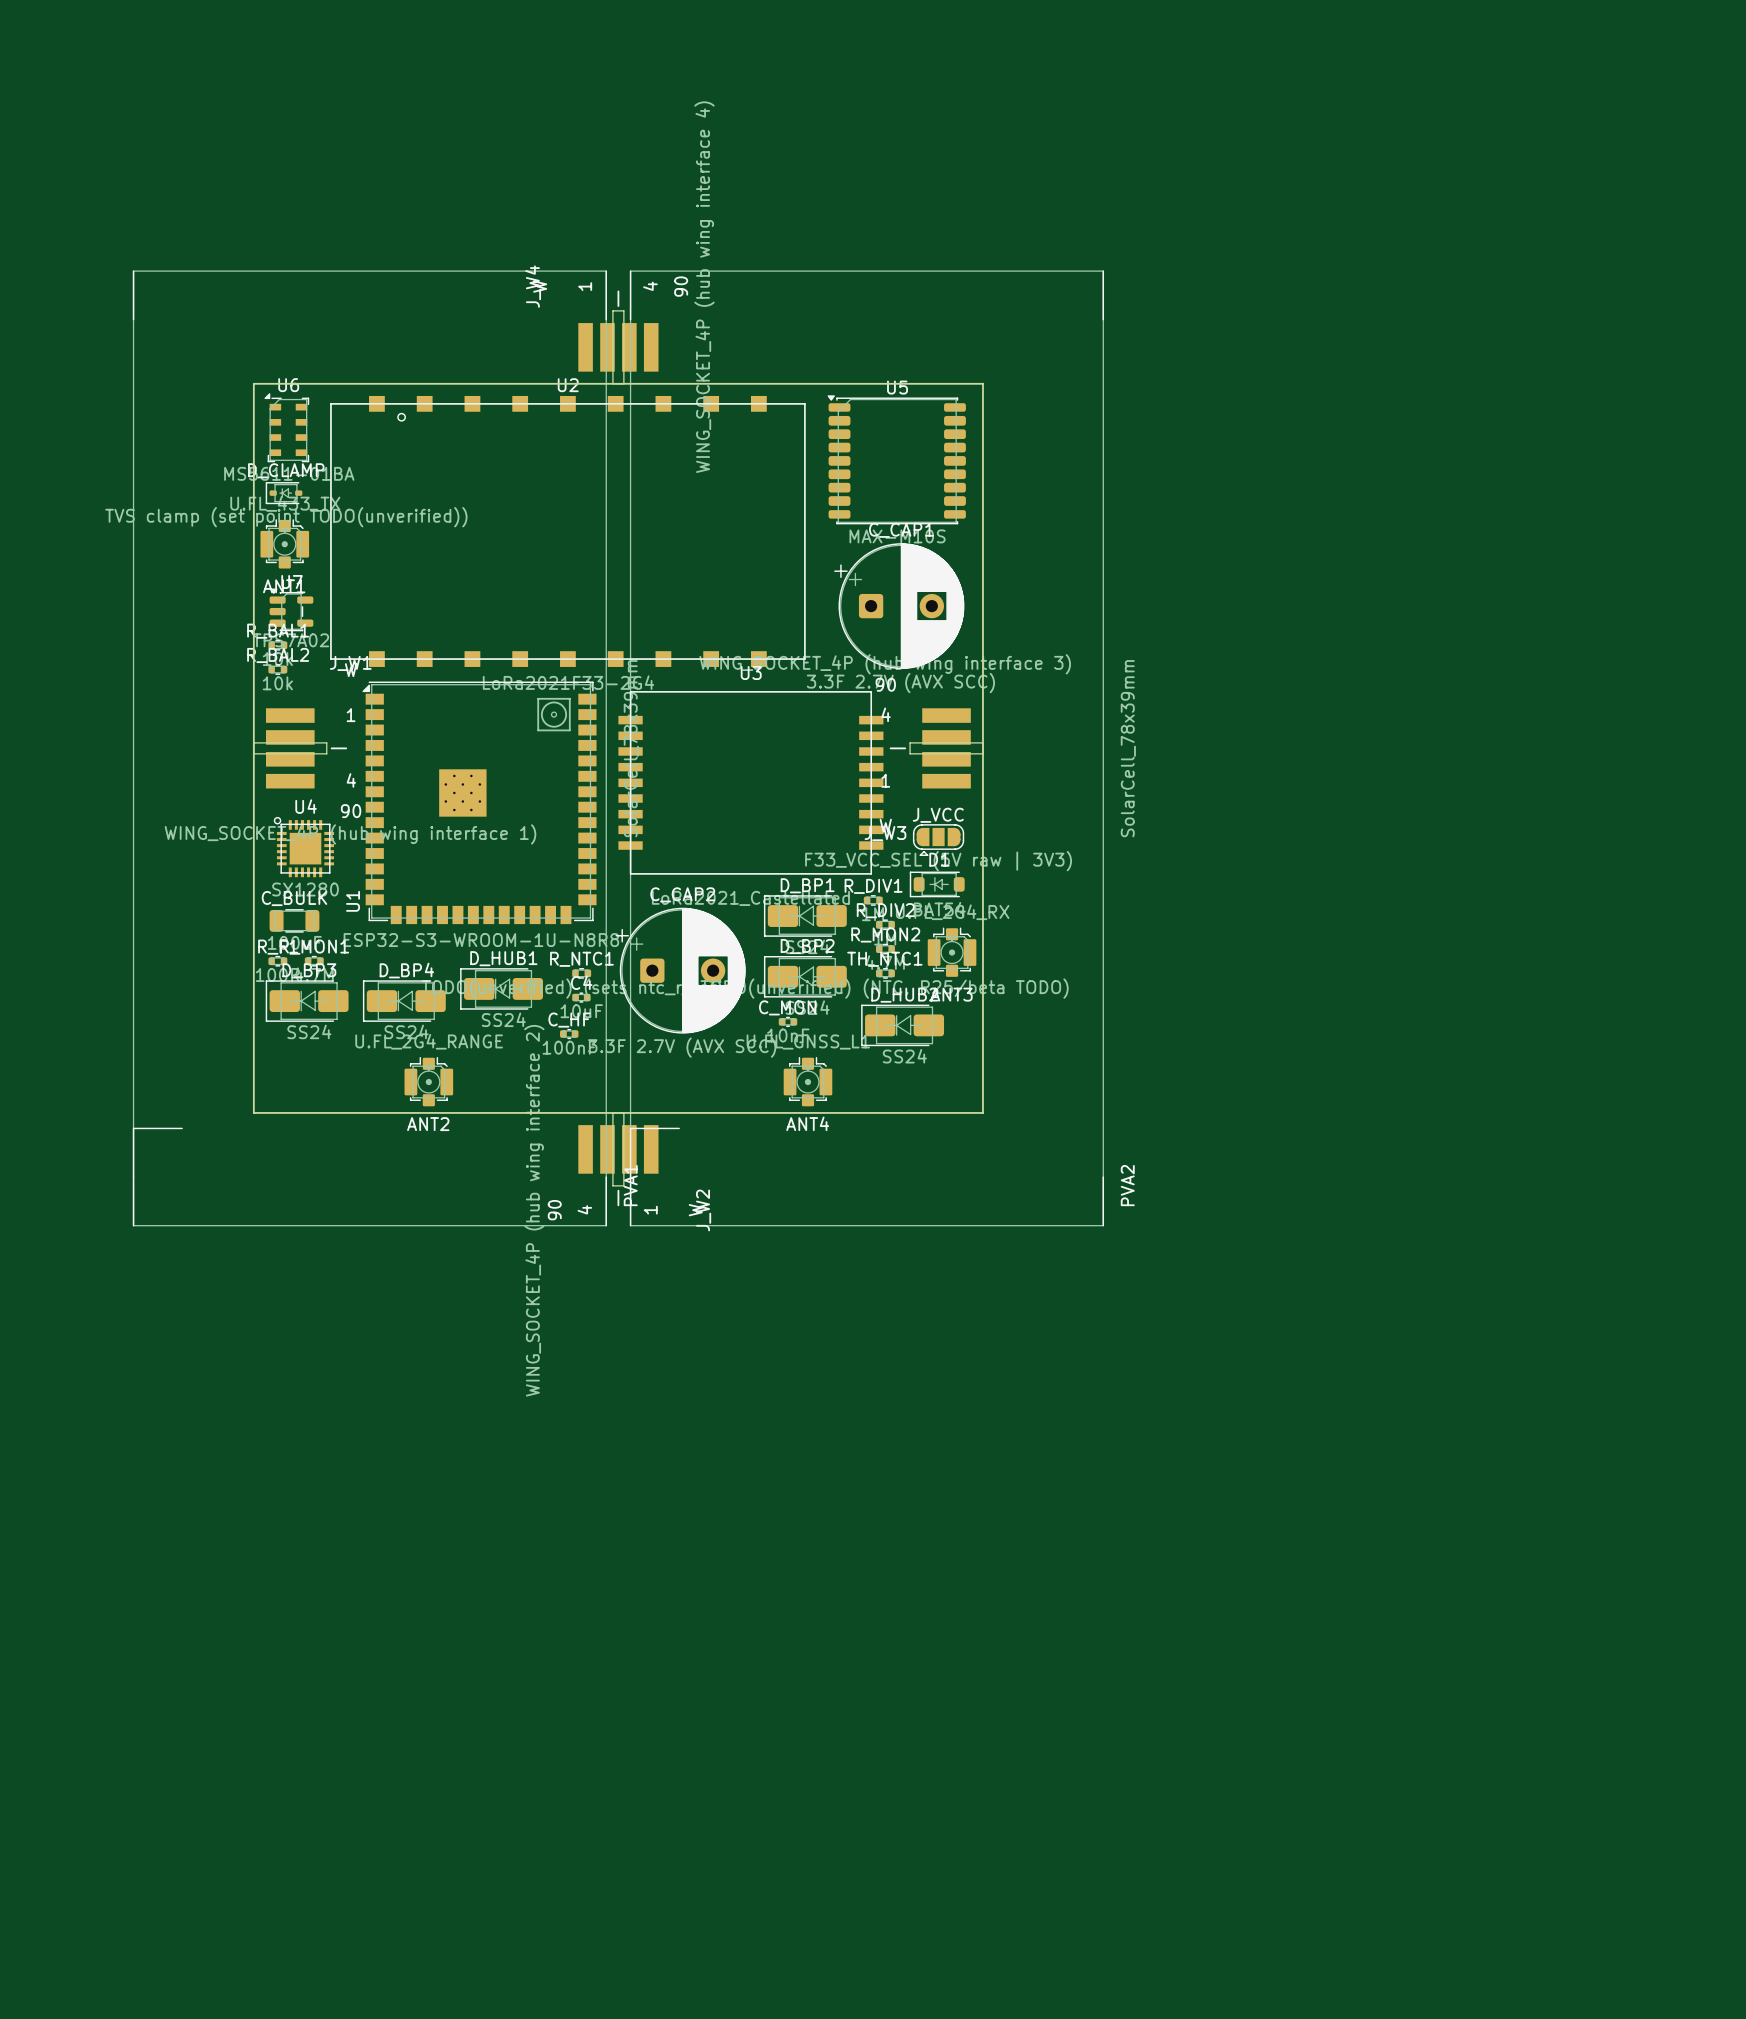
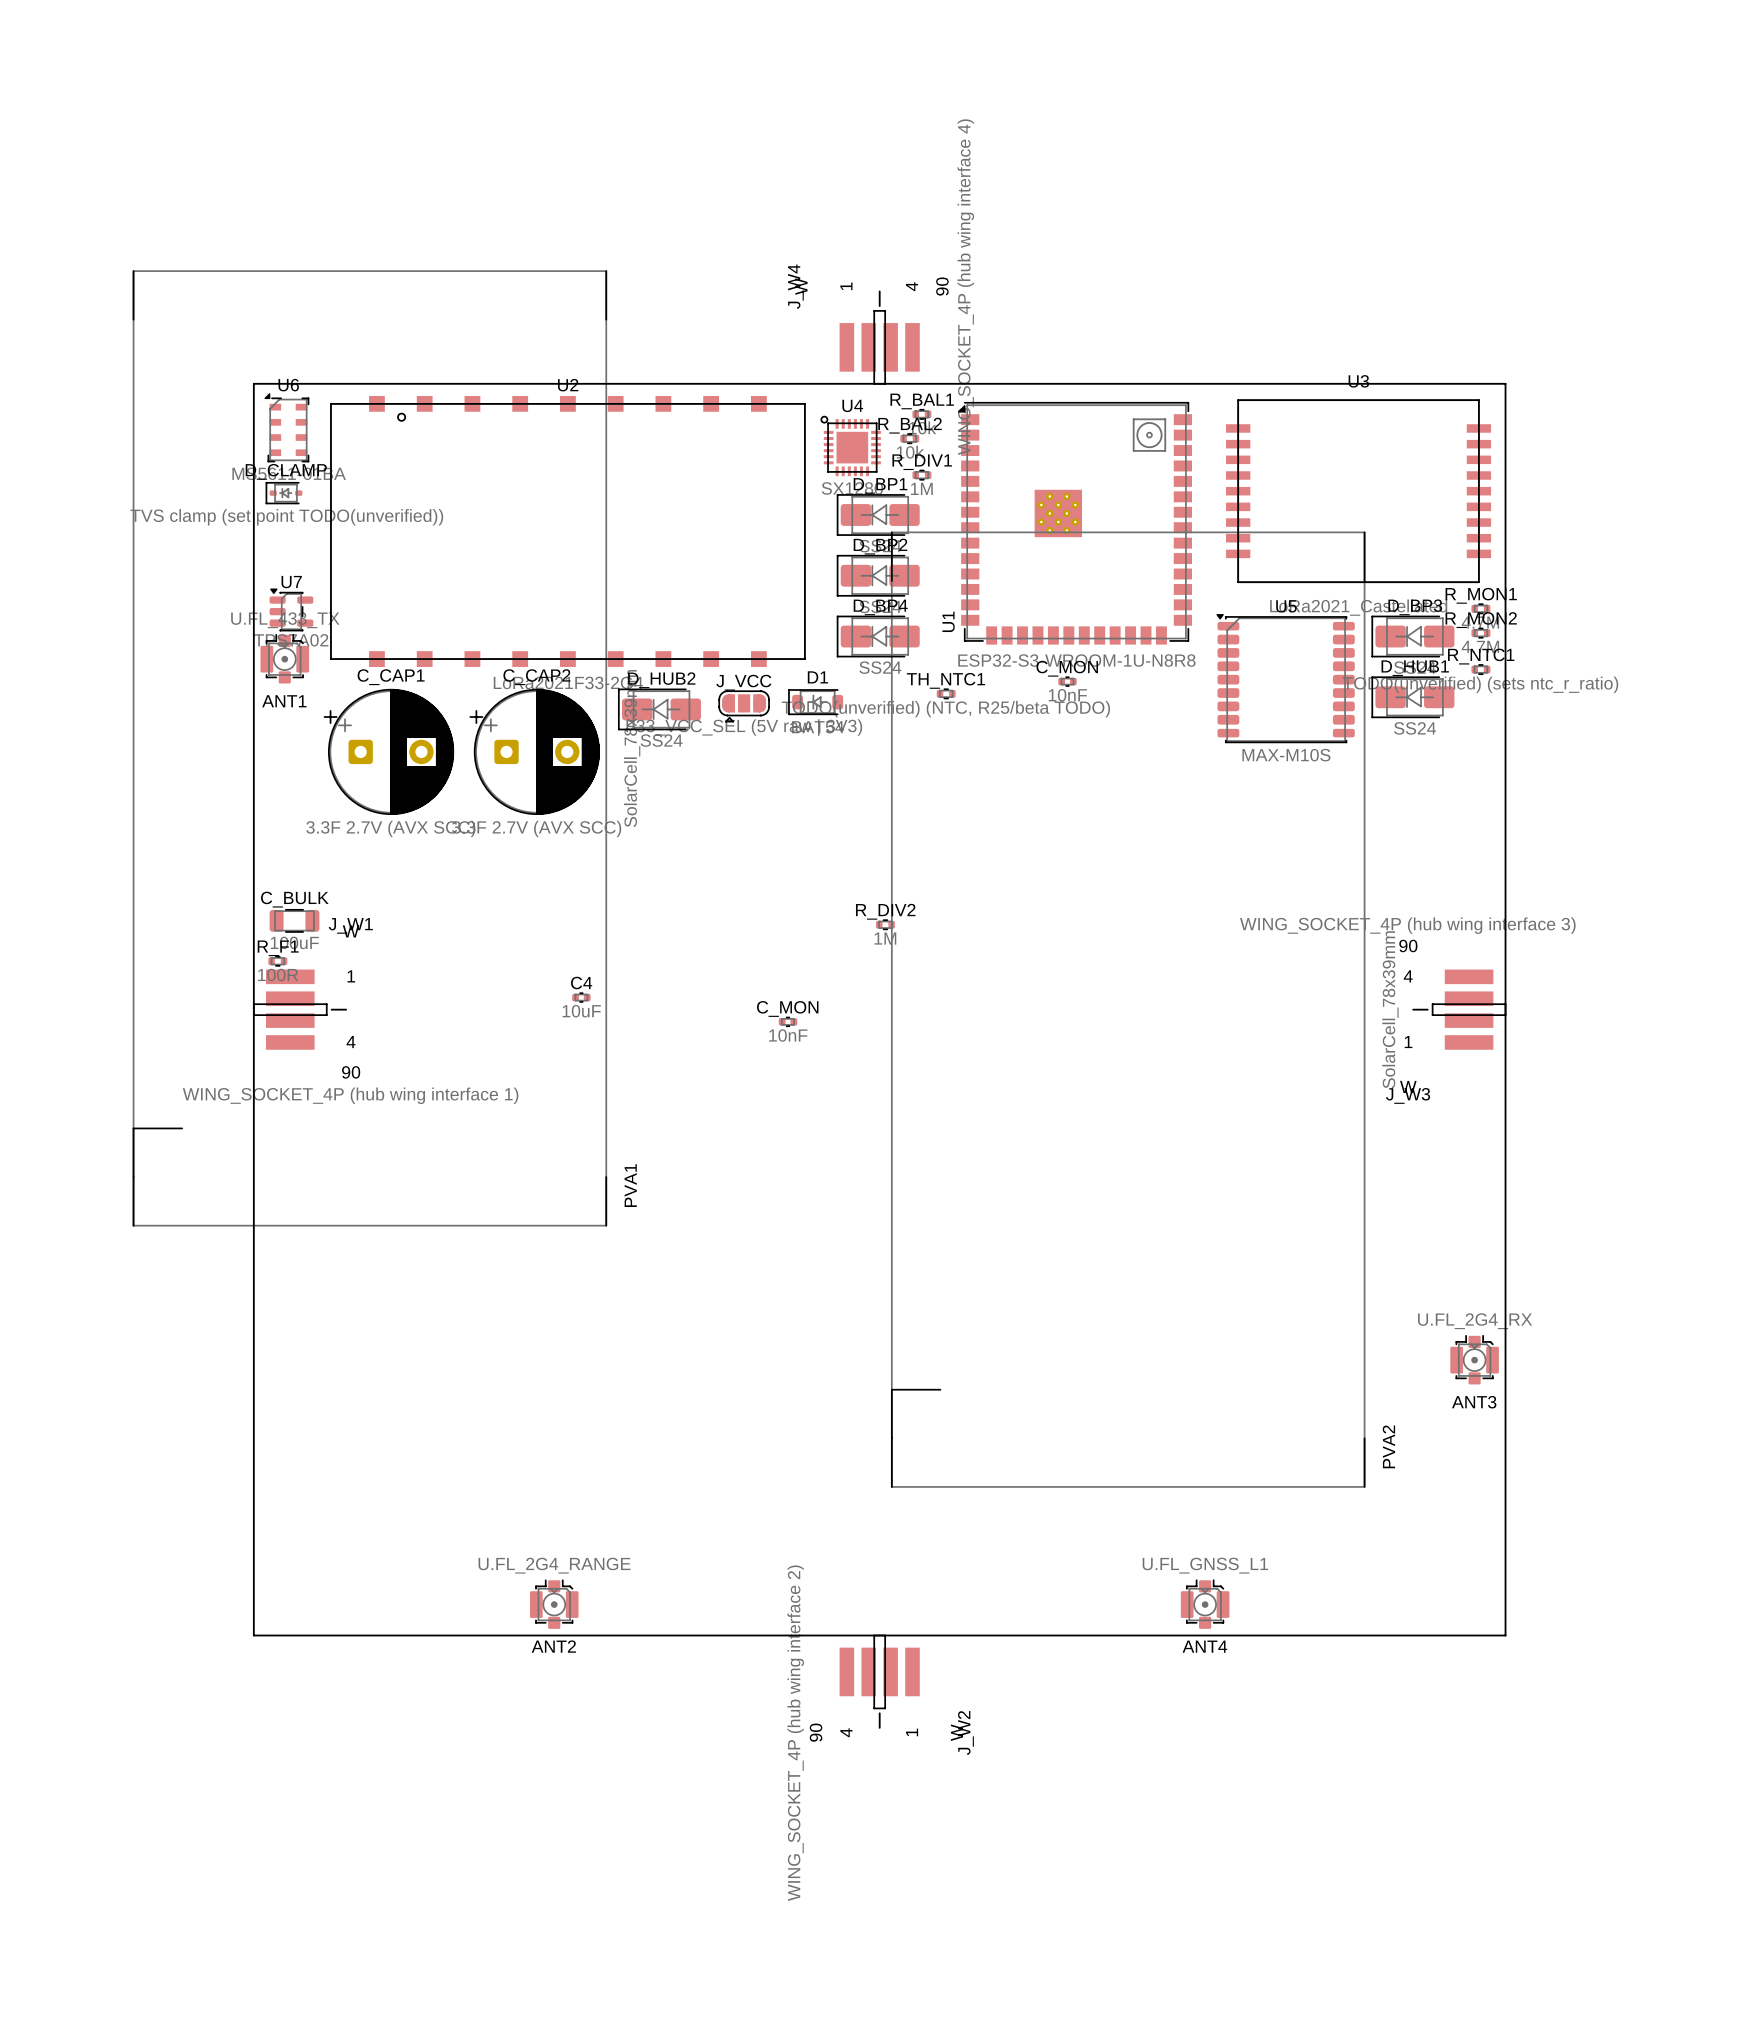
J_W4 position: (618, 337) -> (879, 337)
board edge: (982, 383) (982, 1112) (253, 1112) -> (982, 383) (1505, 383) (1505, 1635) (253, 1635) (253, 1112)
U5 position: (896, 459) -> (1285, 678)
ANT1 position: (284, 543) -> (284, 658)
C_CAP1 position: (899, 606) -> (388, 751)
R_BAL1 position: (277, 645) -> (921, 414)
R_BAL2 position: (277, 669) -> (909, 438)
C_MON: none -> 10nF (1067, 681)
J_W1 position: (300, 748) -> (300, 1009)
PVA2 position: (866, 748) -> (1128, 1009)
J_W3 position: (936, 748) -> (1459, 1009)
U3 position: (750, 782) -> (1358, 491)
U1 position: (479, 802) -> (1074, 523)
J_VCC position: (938, 840) -> (744, 706)
U4 position: (303, 847) -> (850, 446)
D1 position: (937, 884) -> (815, 702)
R_DIV1 position: (873, 900) -> (921, 475)
D_BP1 position: (805, 916) -> (878, 514)
R_MON2 position: (885, 949) -> (1480, 633)
ANT3 position: (952, 952) -> (1474, 1359)
R_MON1 position: (314, 961) -> (1480, 608)
C_CAP2 position: (680, 970) -> (534, 751)
R_NTC1 position: (581, 973) -> (1480, 669)
TH_NTC1 position: (885, 973) -> (946, 693)
D_BP2 position: (805, 976) -> (878, 575)
D_HUB1 position: (501, 988) -> (1412, 697)
D_BP3 position: (307, 1001) -> (1412, 636)
D_BP4 position: (404, 1001) -> (878, 636)
D_HUB2 position: (902, 1025) -> (659, 709)
C_HF: 100nF (569, 1034) -> none
ANT2 position: (428, 1081) -> (554, 1604)
ANT4 position: (807, 1081) -> (1205, 1604)
J_W2 position: (618, 1159) -> (879, 1681)

